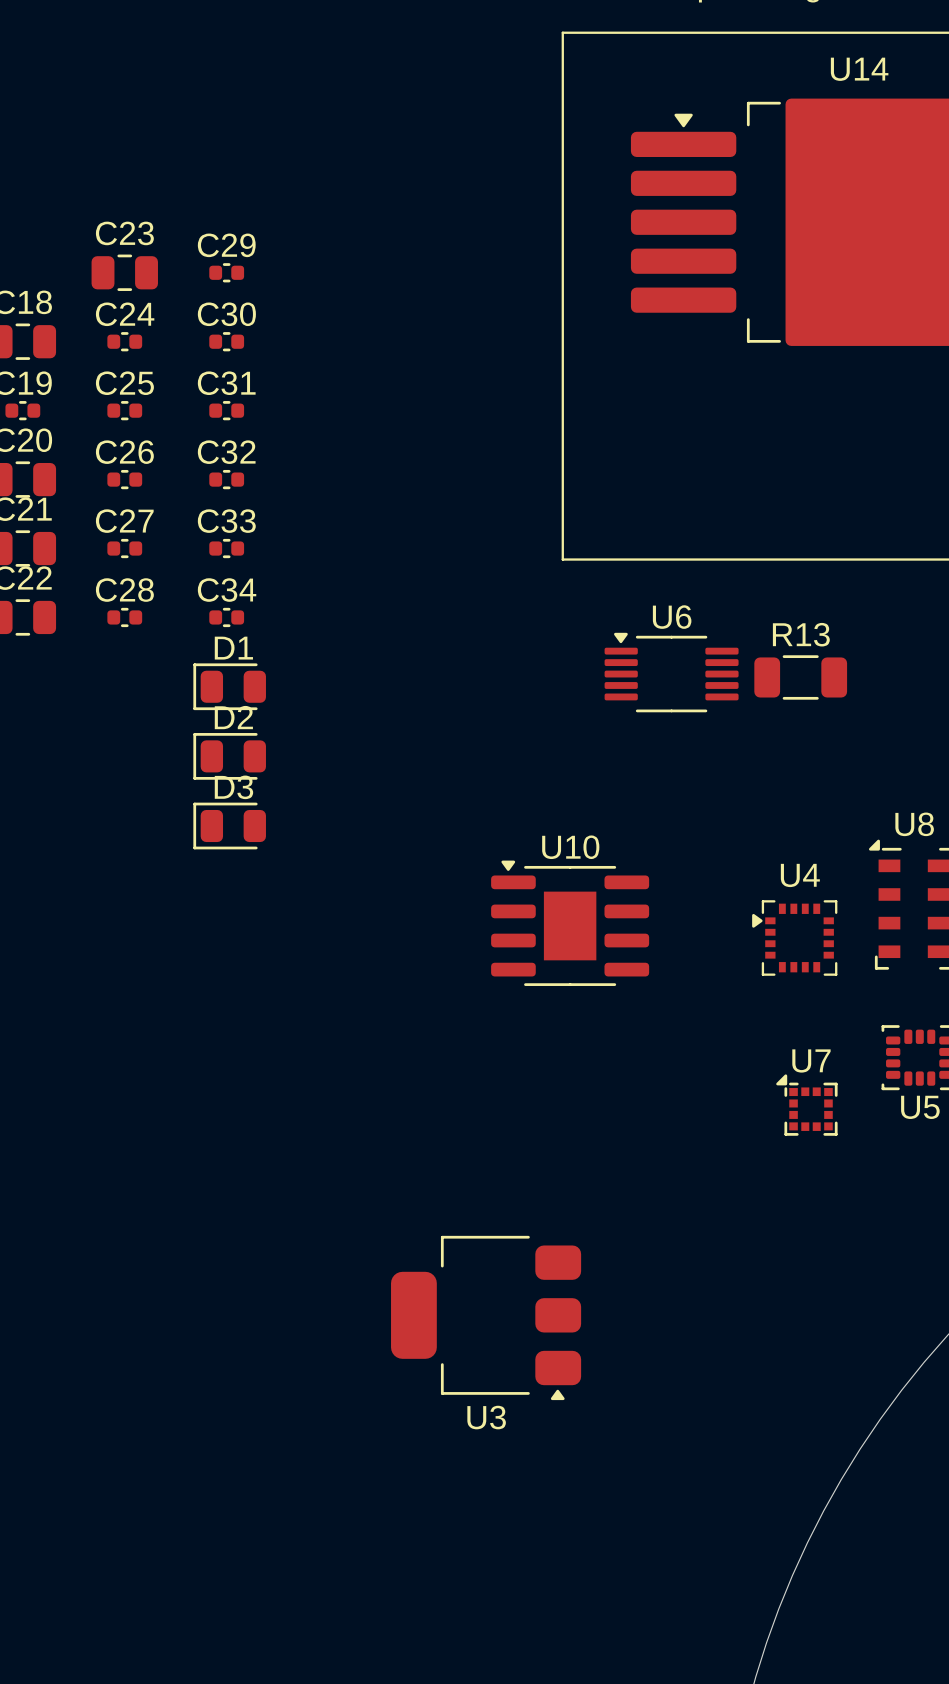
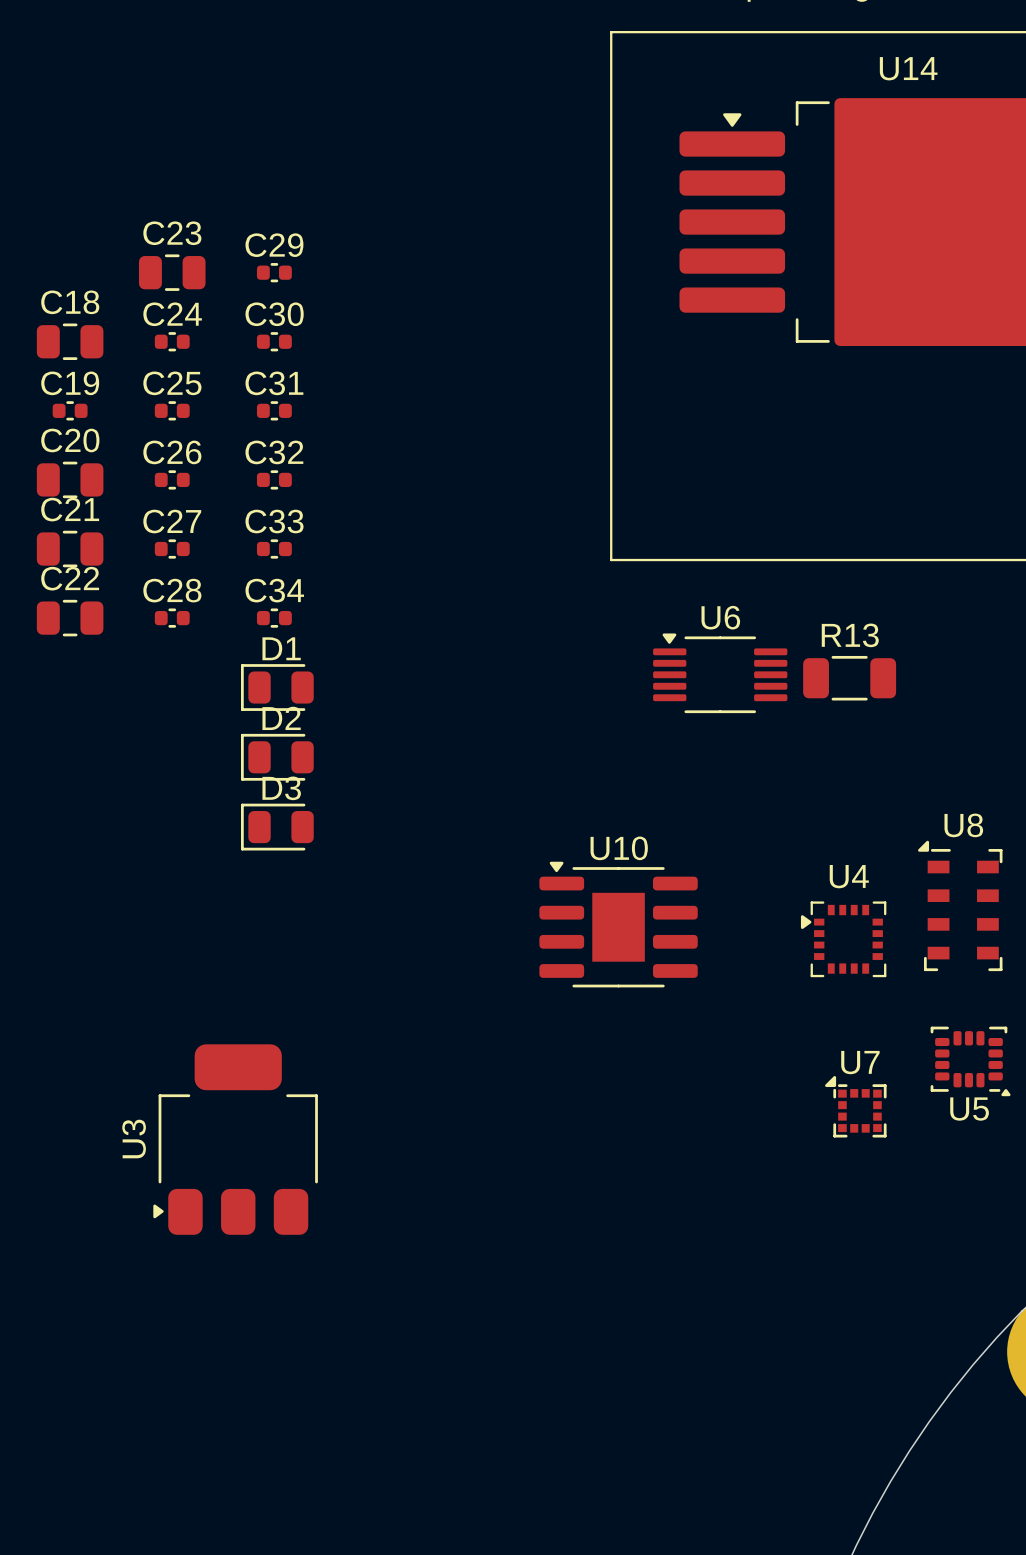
U3 rotation: 0° (486, 1317) -> 90° clockwise (235, 1139)
U3 position: (486, 1317) -> (235, 1139)

